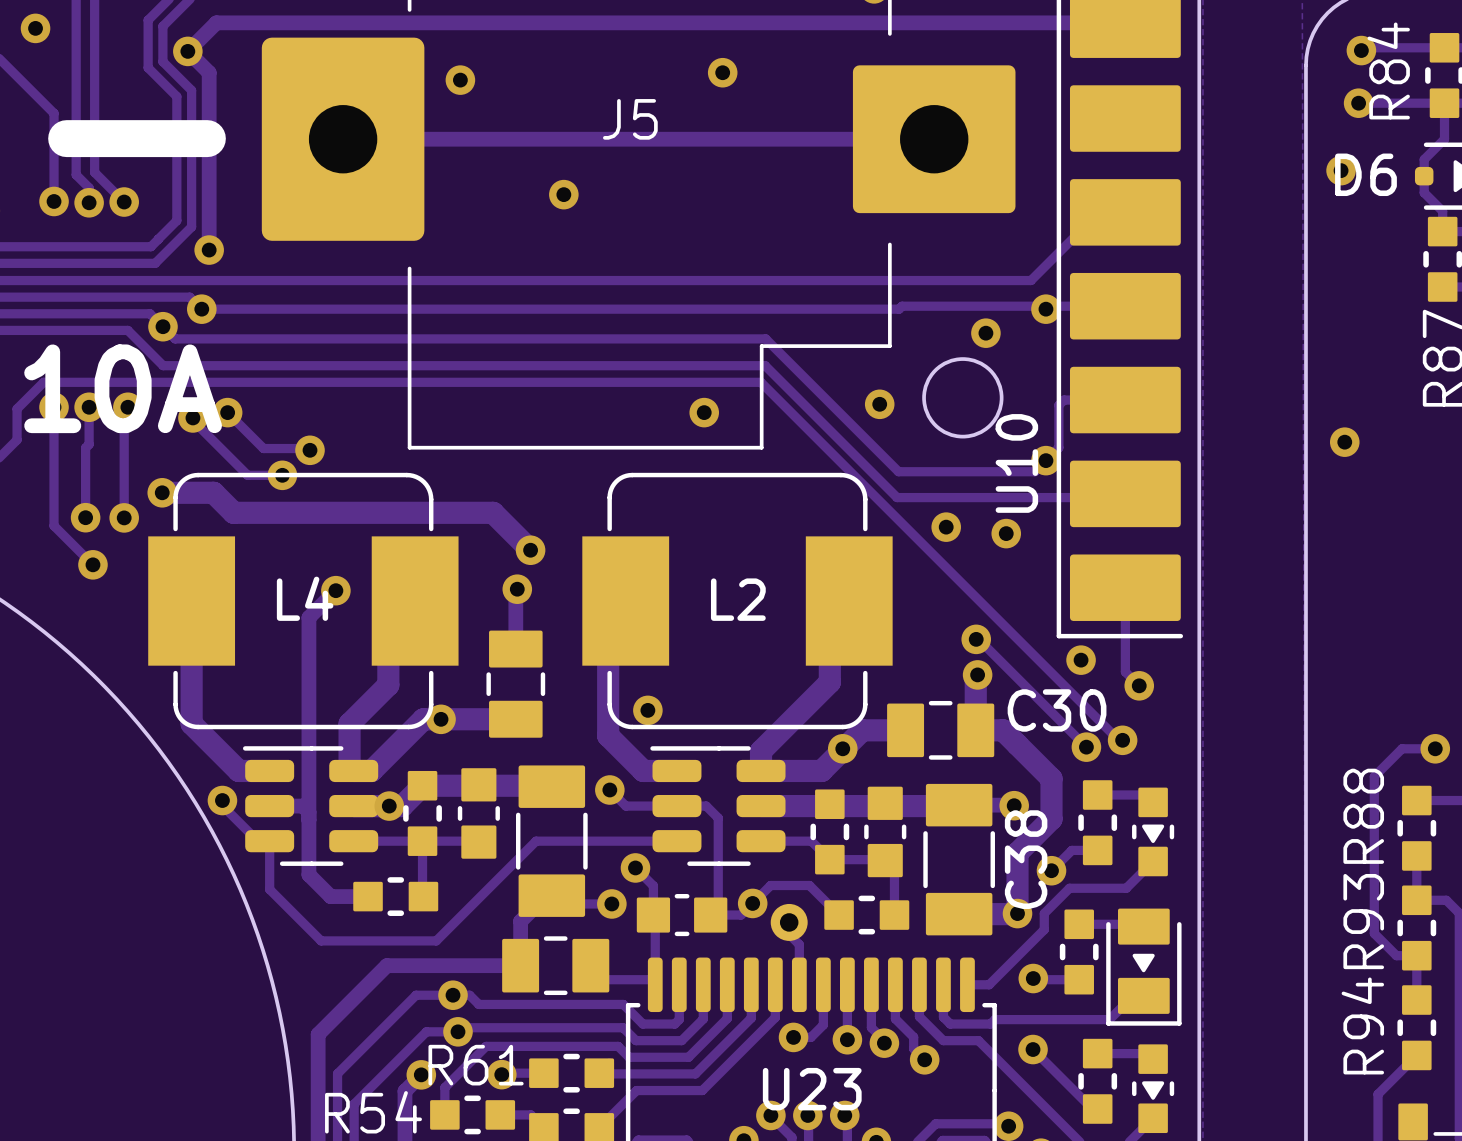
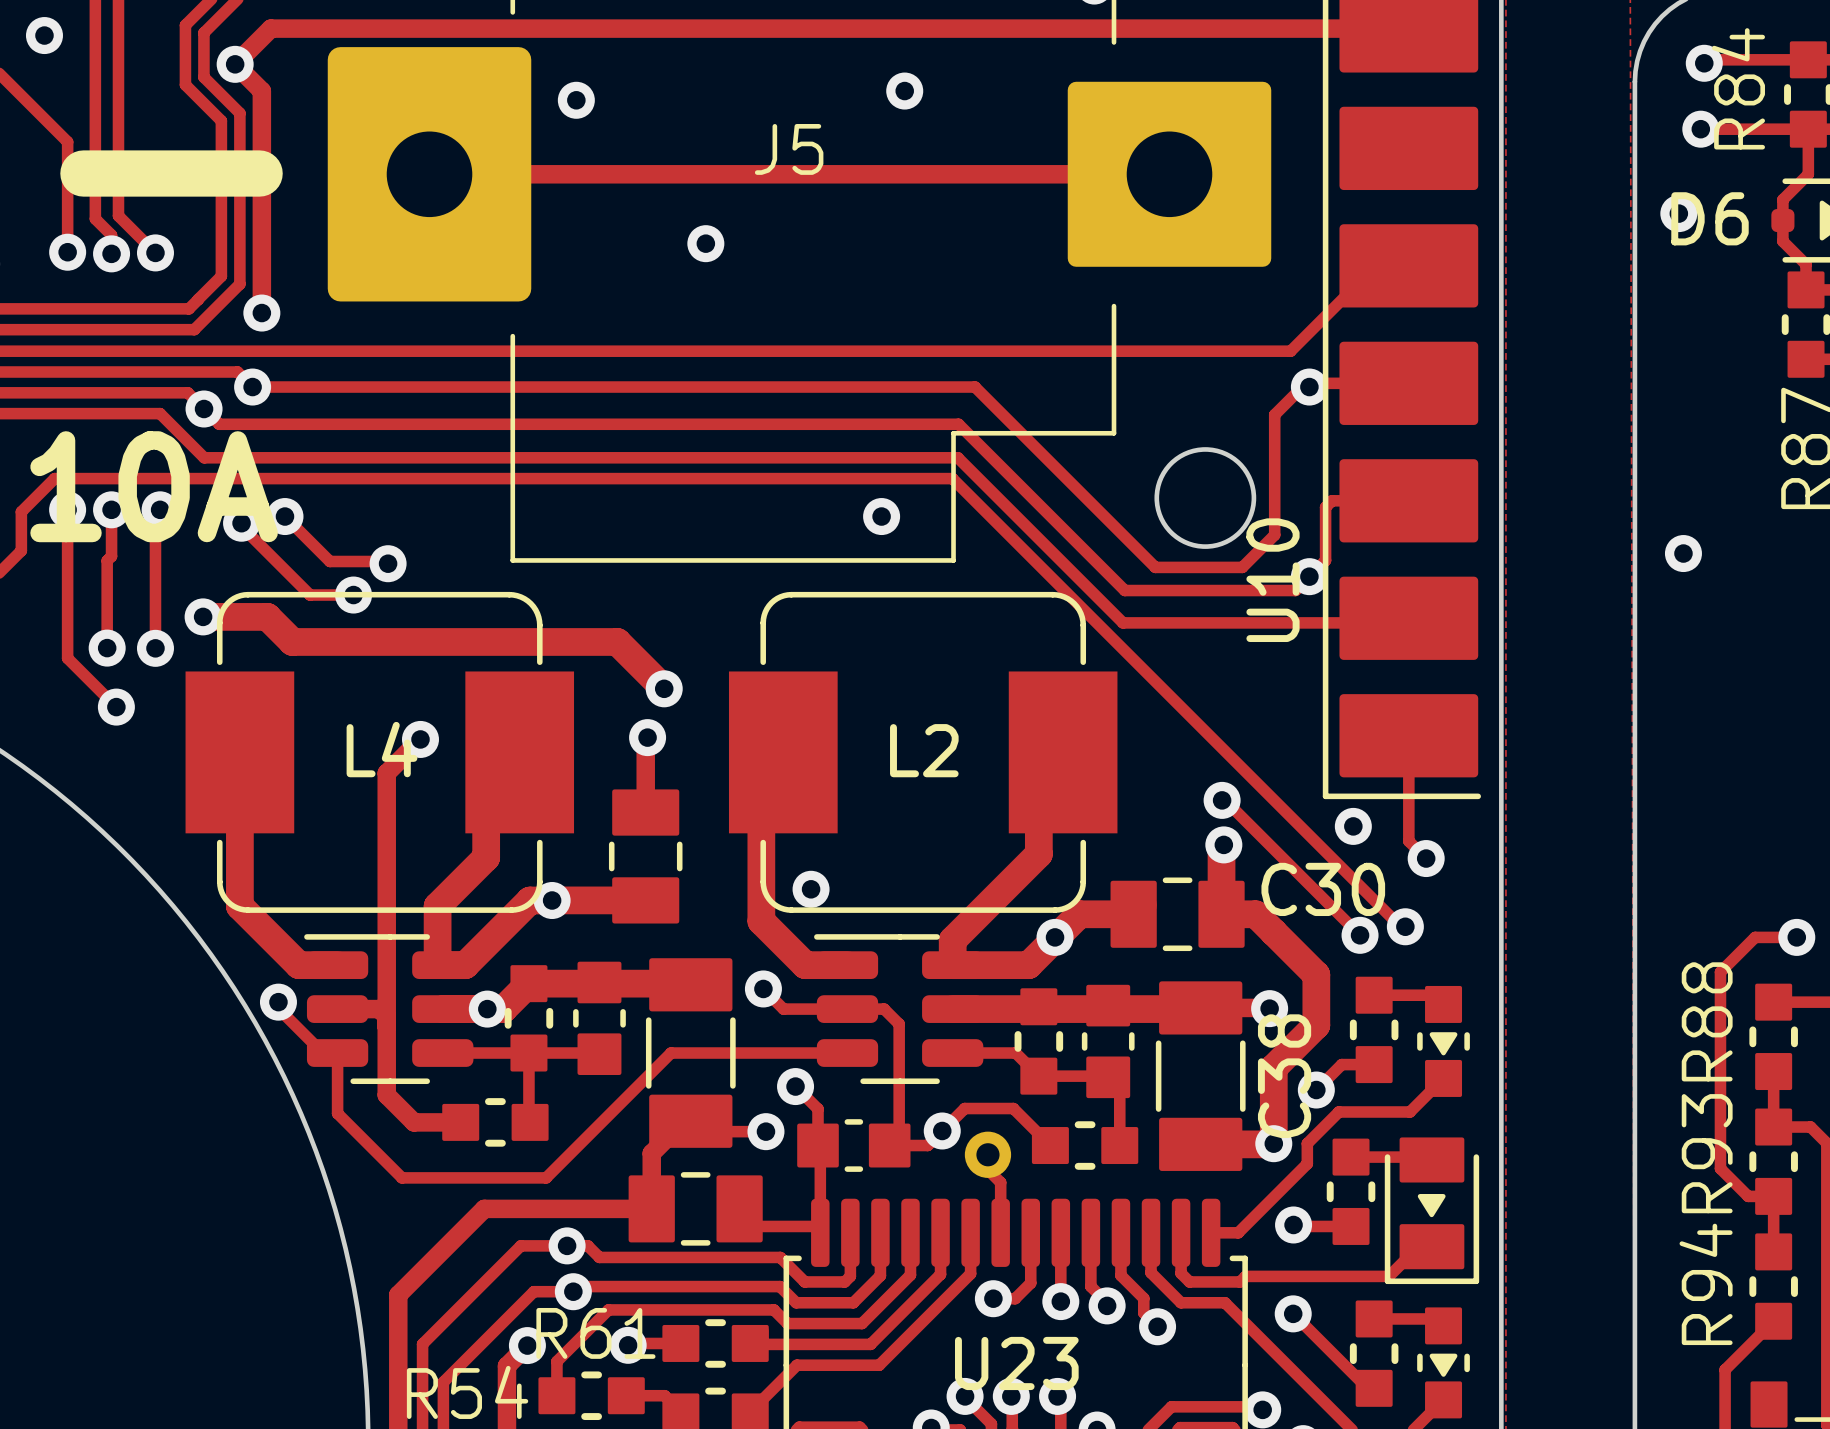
track: (1043, 306) (902, 306) (899, 309) (778, 309) -> (1306, 383) (1274, 414) (1274, 535) (1242, 567) (1155, 567) (975, 387)
via: (985, 333) -> none
via: (879, 404) -> none
via: (946, 527) -> none
via: (1006, 533) -> none

